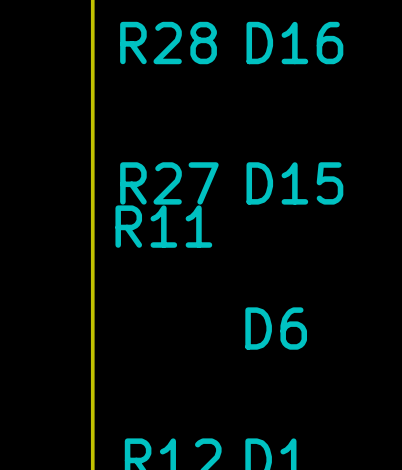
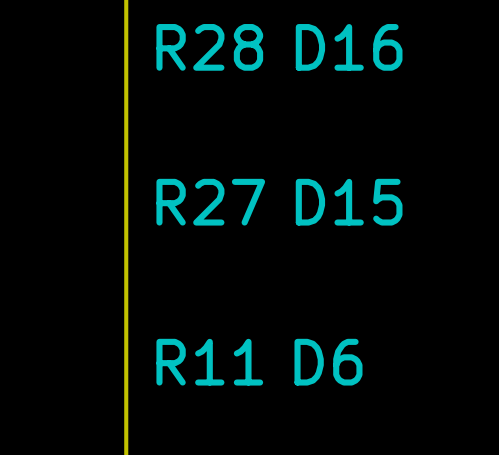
R11 position: (163, 226) -> (209, 362)

